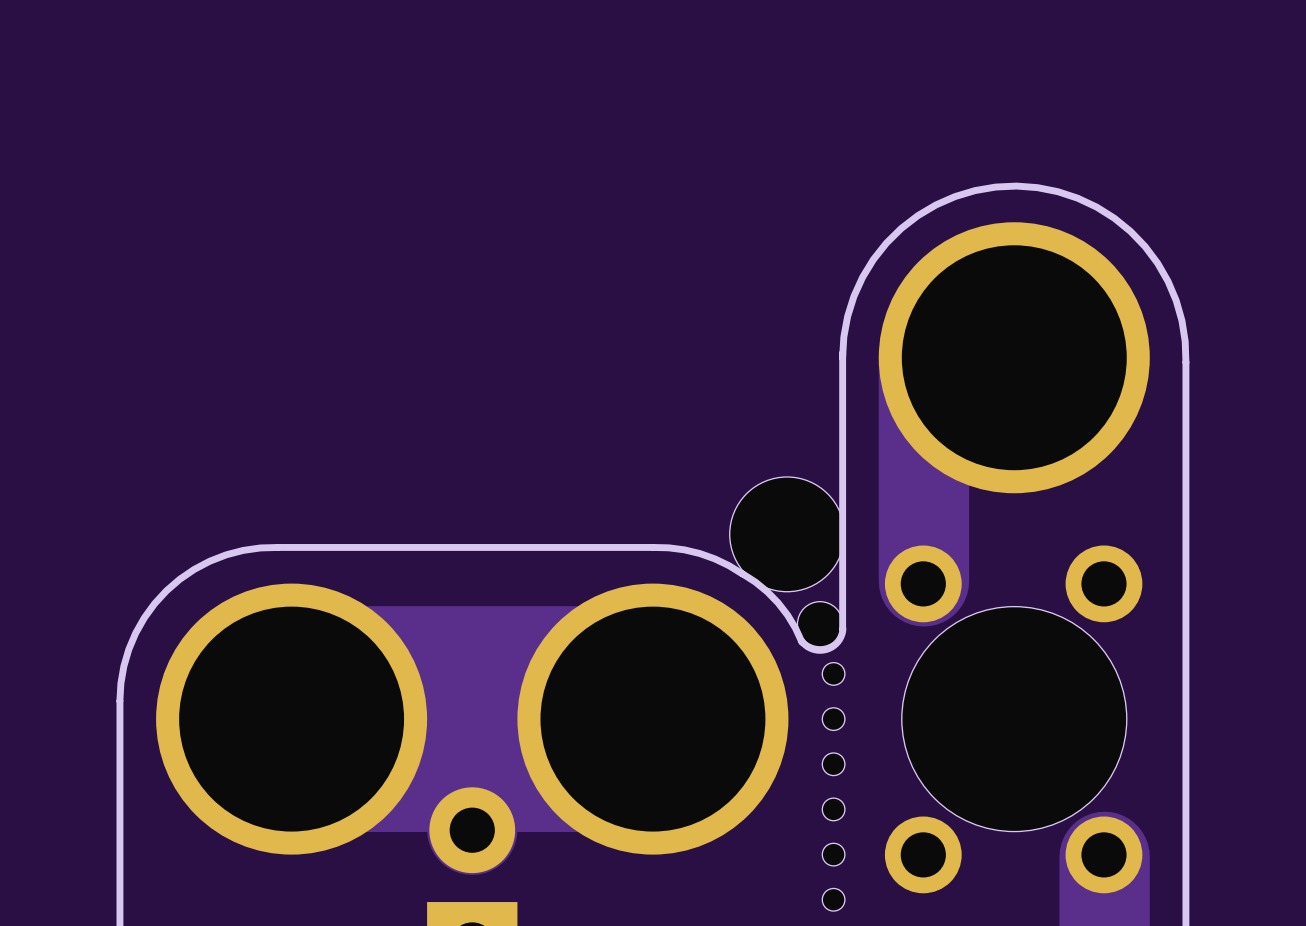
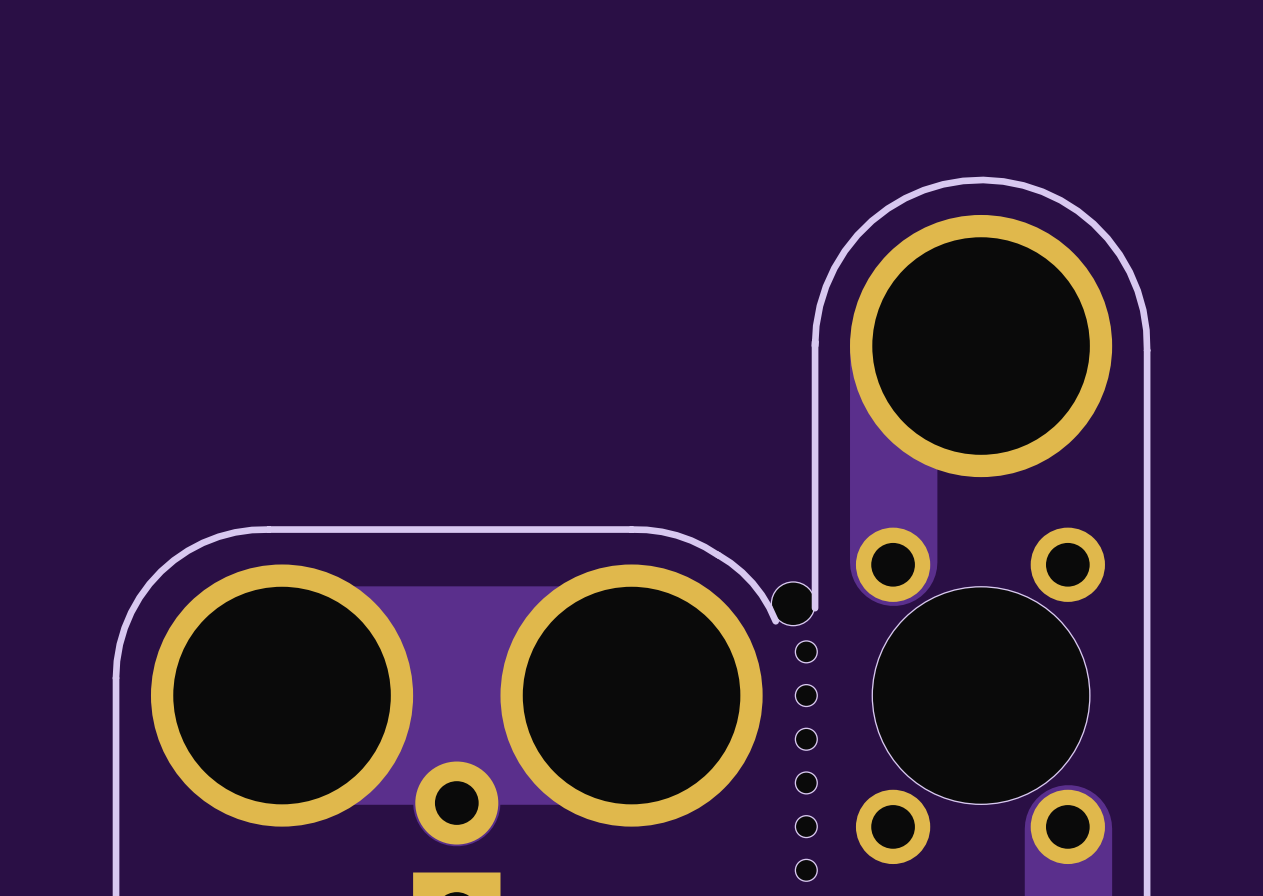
part: (787, 534) -> none
board edge: (842, 628) (838, 641) (826, 649) (812, 649) (801, 640) -> none

